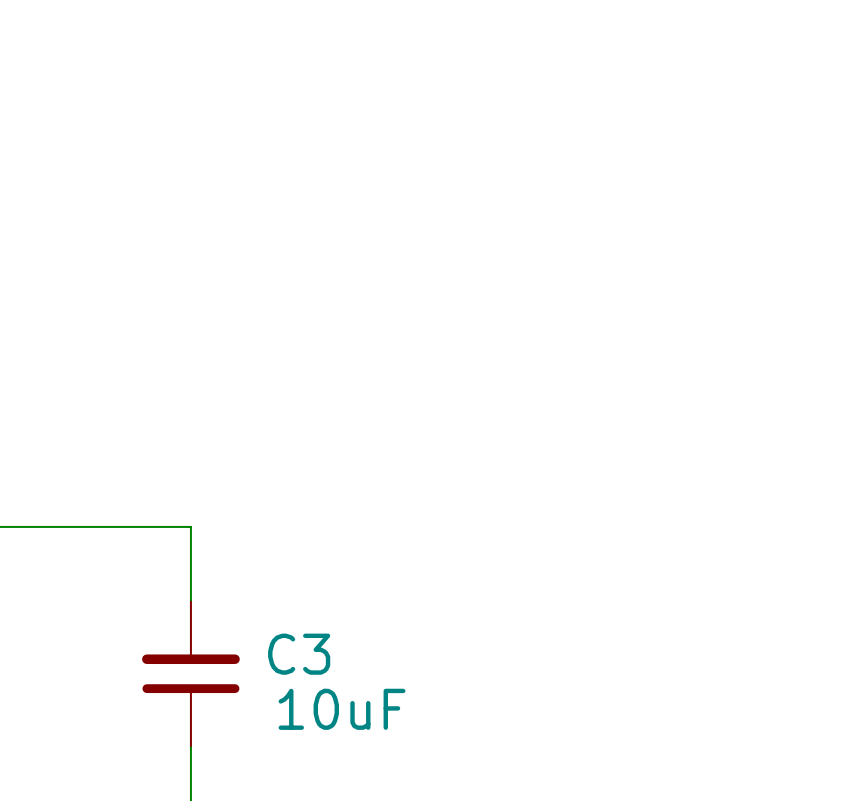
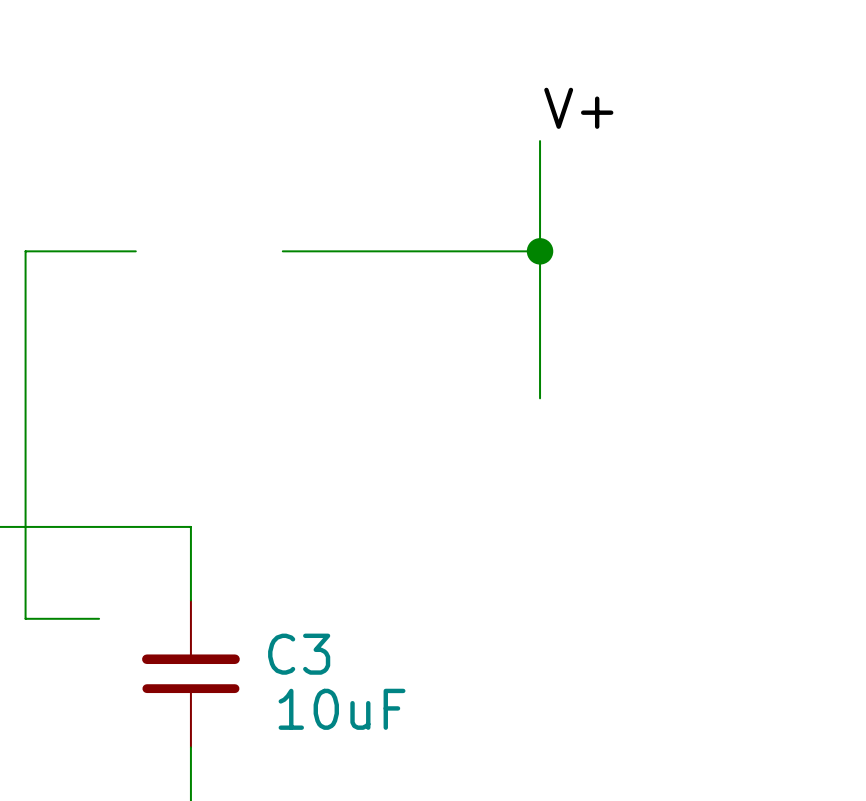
label: none -> V+ (578, 108)
wire: none -> (540, 141) (540, 398)
wire: none -> (135, 251) (25, 251) (25, 618) (99, 618)
wire: none -> (282, 251) (540, 251)
junction: none -> (540, 251)

